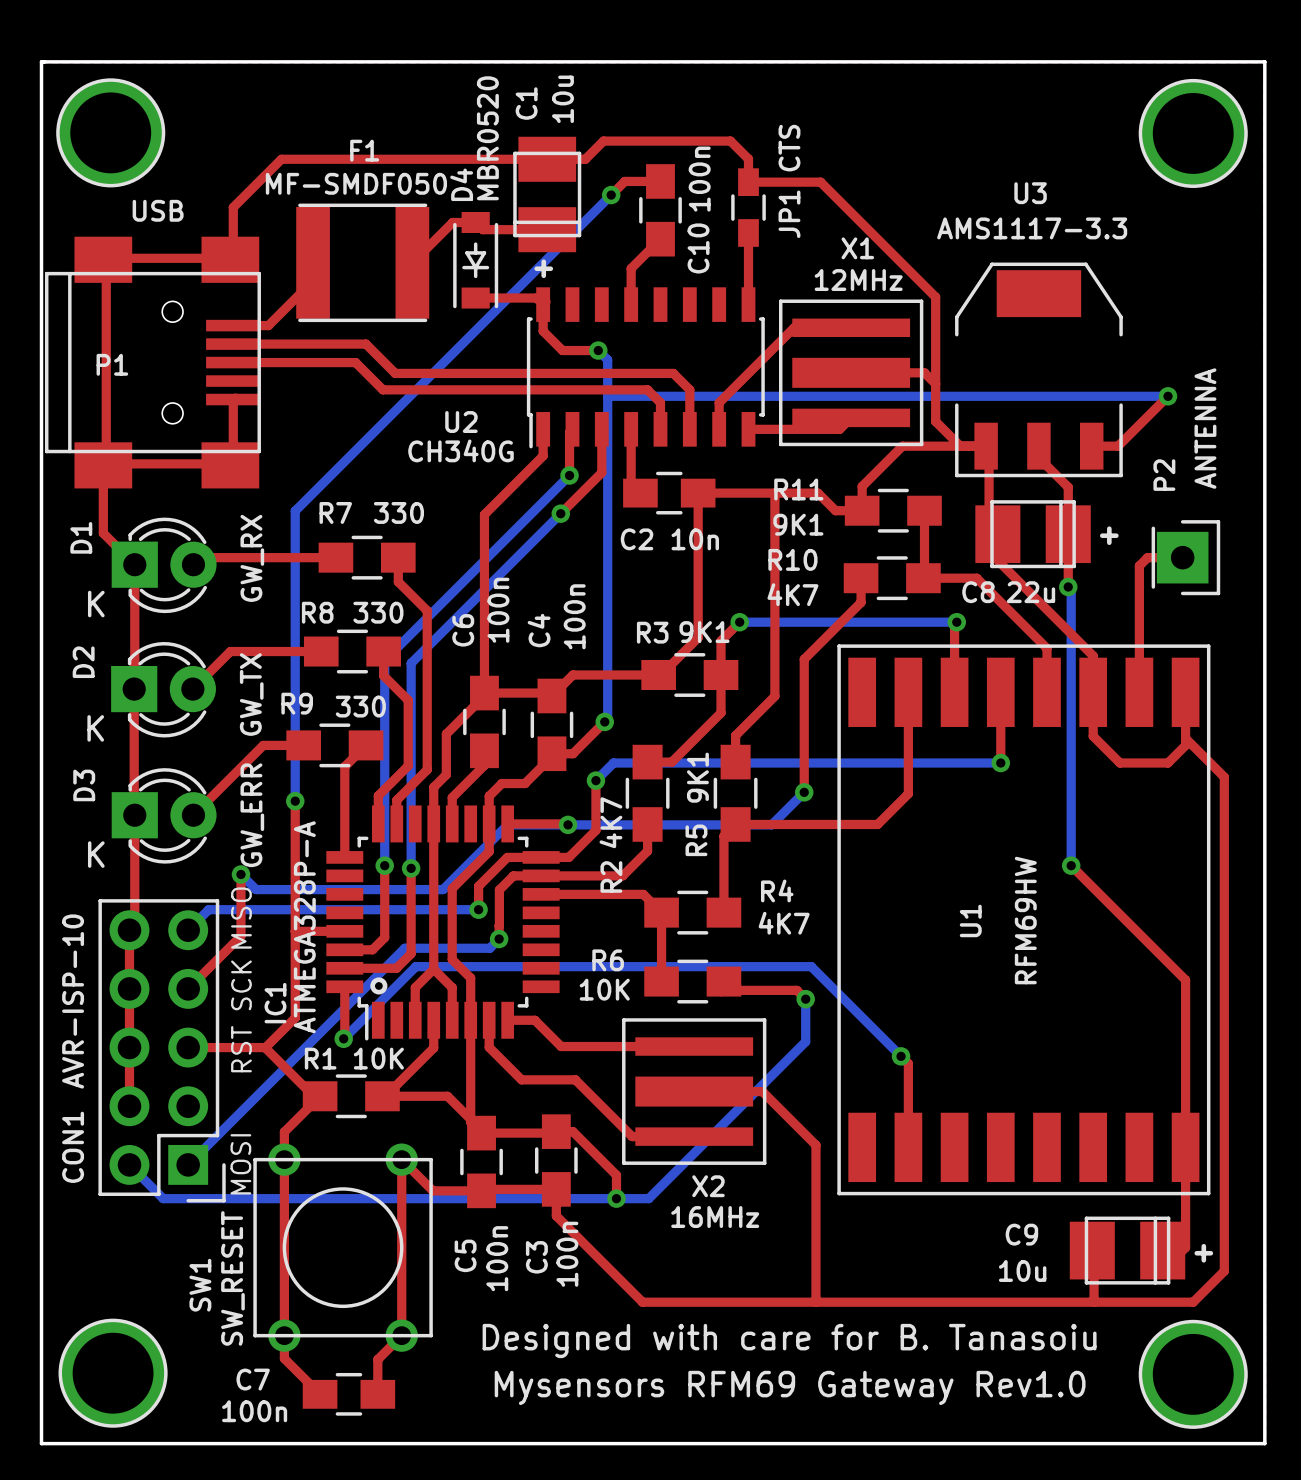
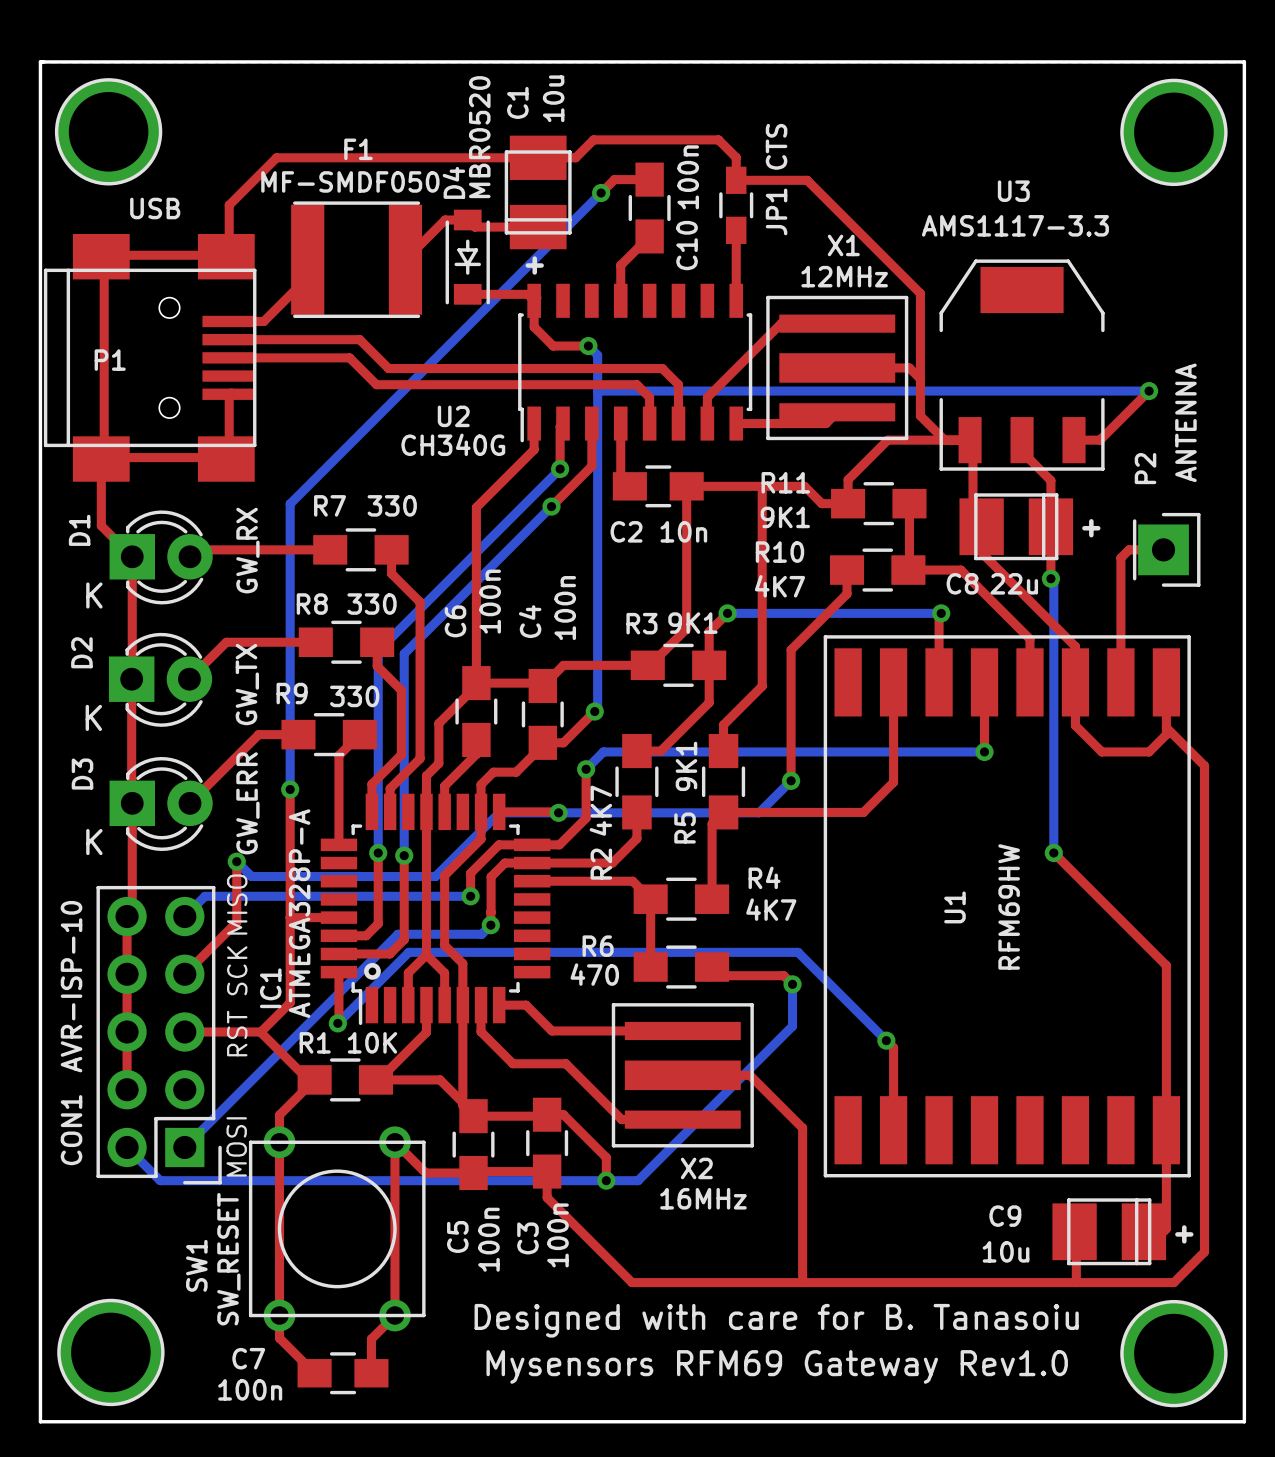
R6 value: 10K (604, 989) -> 470 (594, 974)

